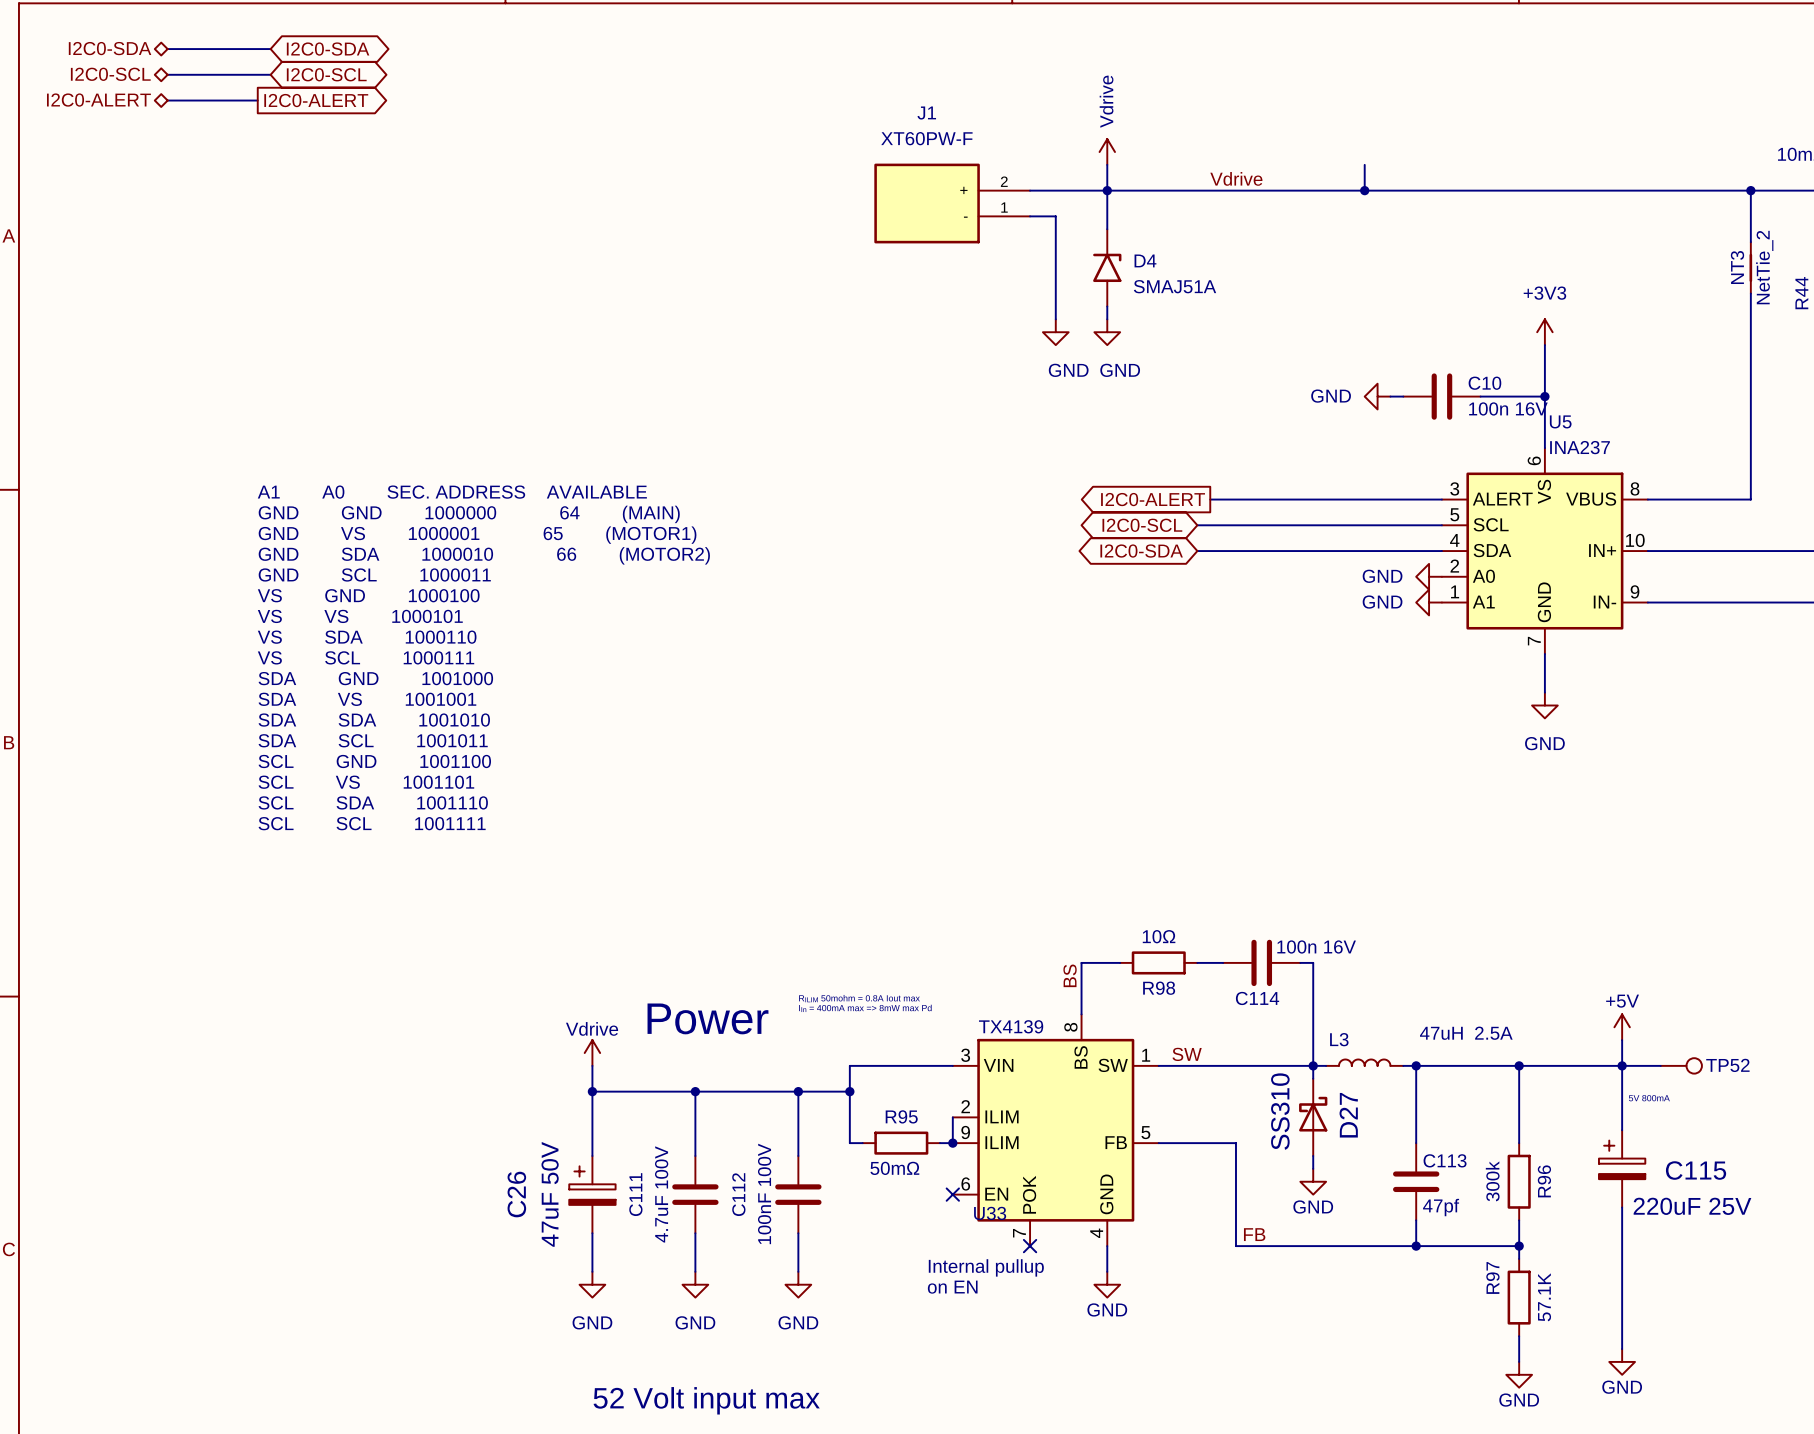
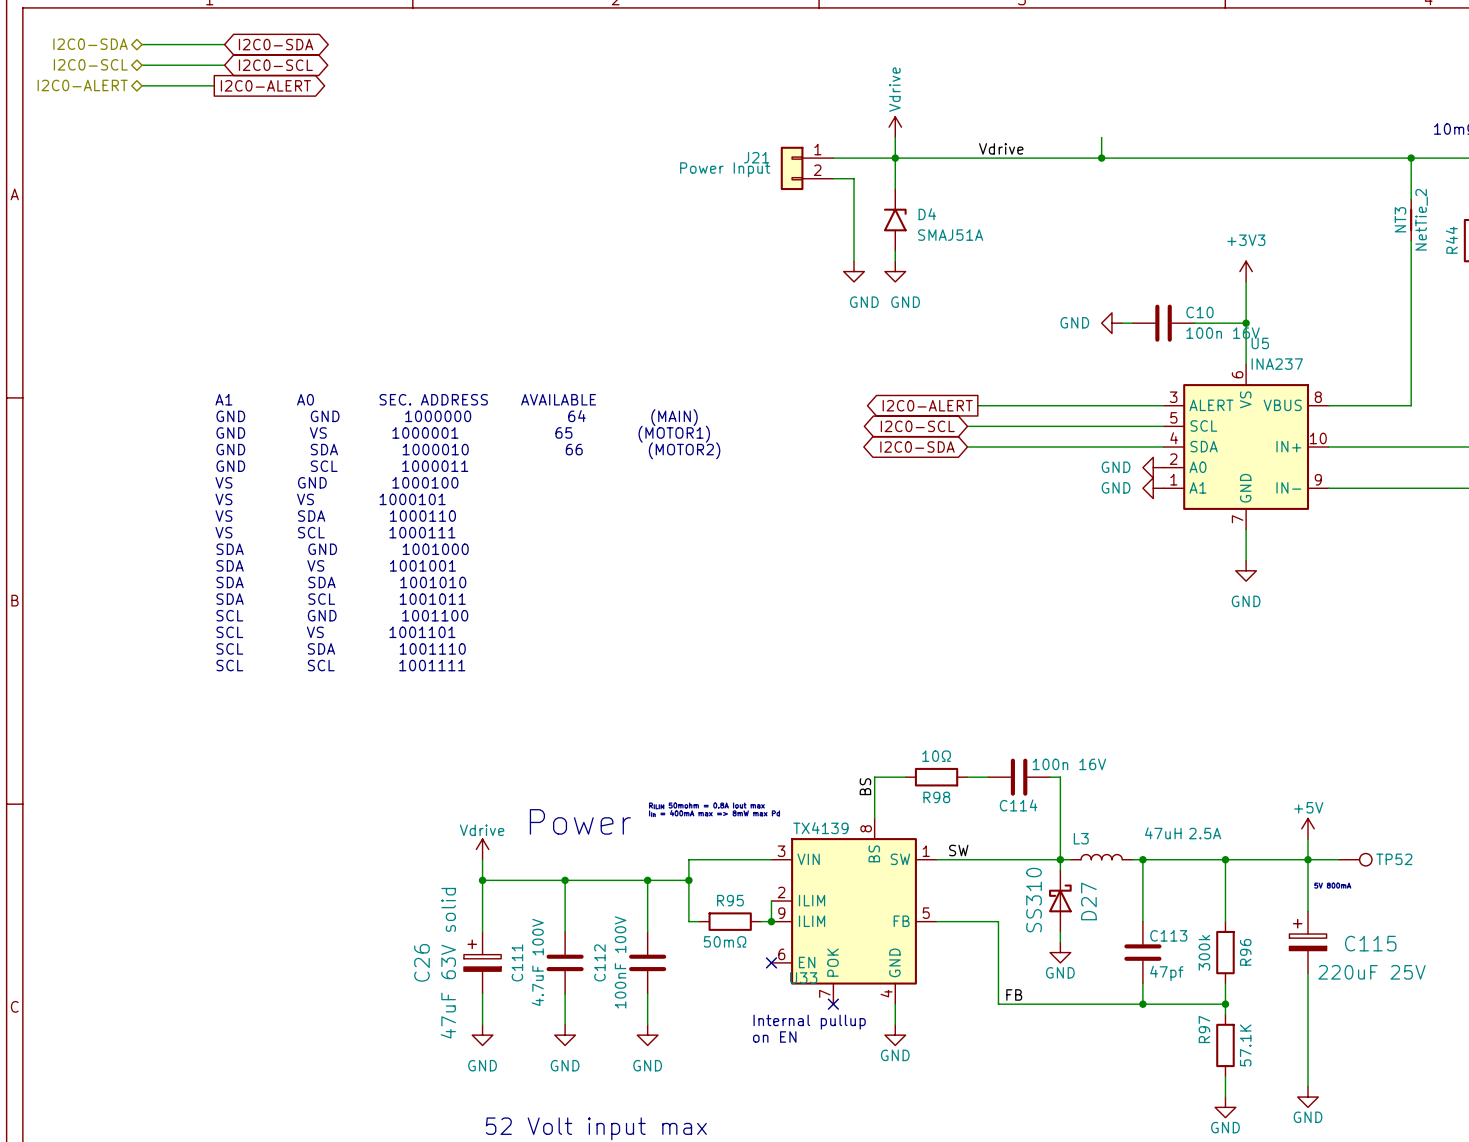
J1: XT60PW-F (952, 203) -> none
J21: none -> Power Input (807, 168)
C26 value: 47uF 50V (550, 1194) -> 47uF 63V solid (448, 963)

